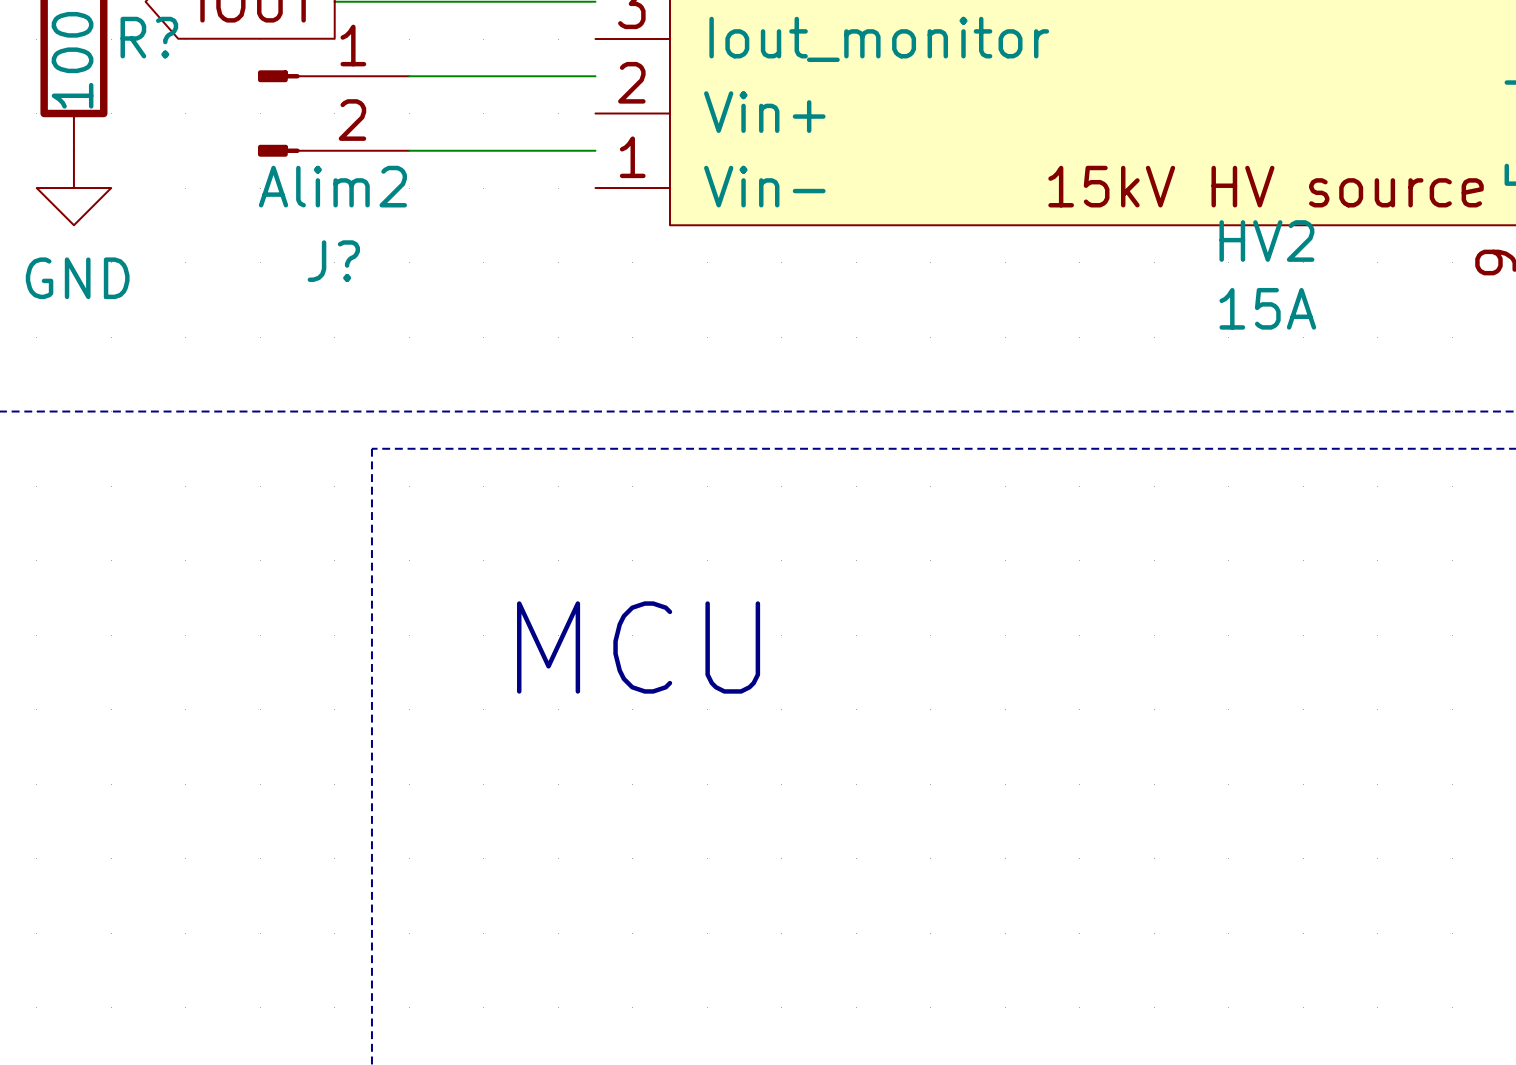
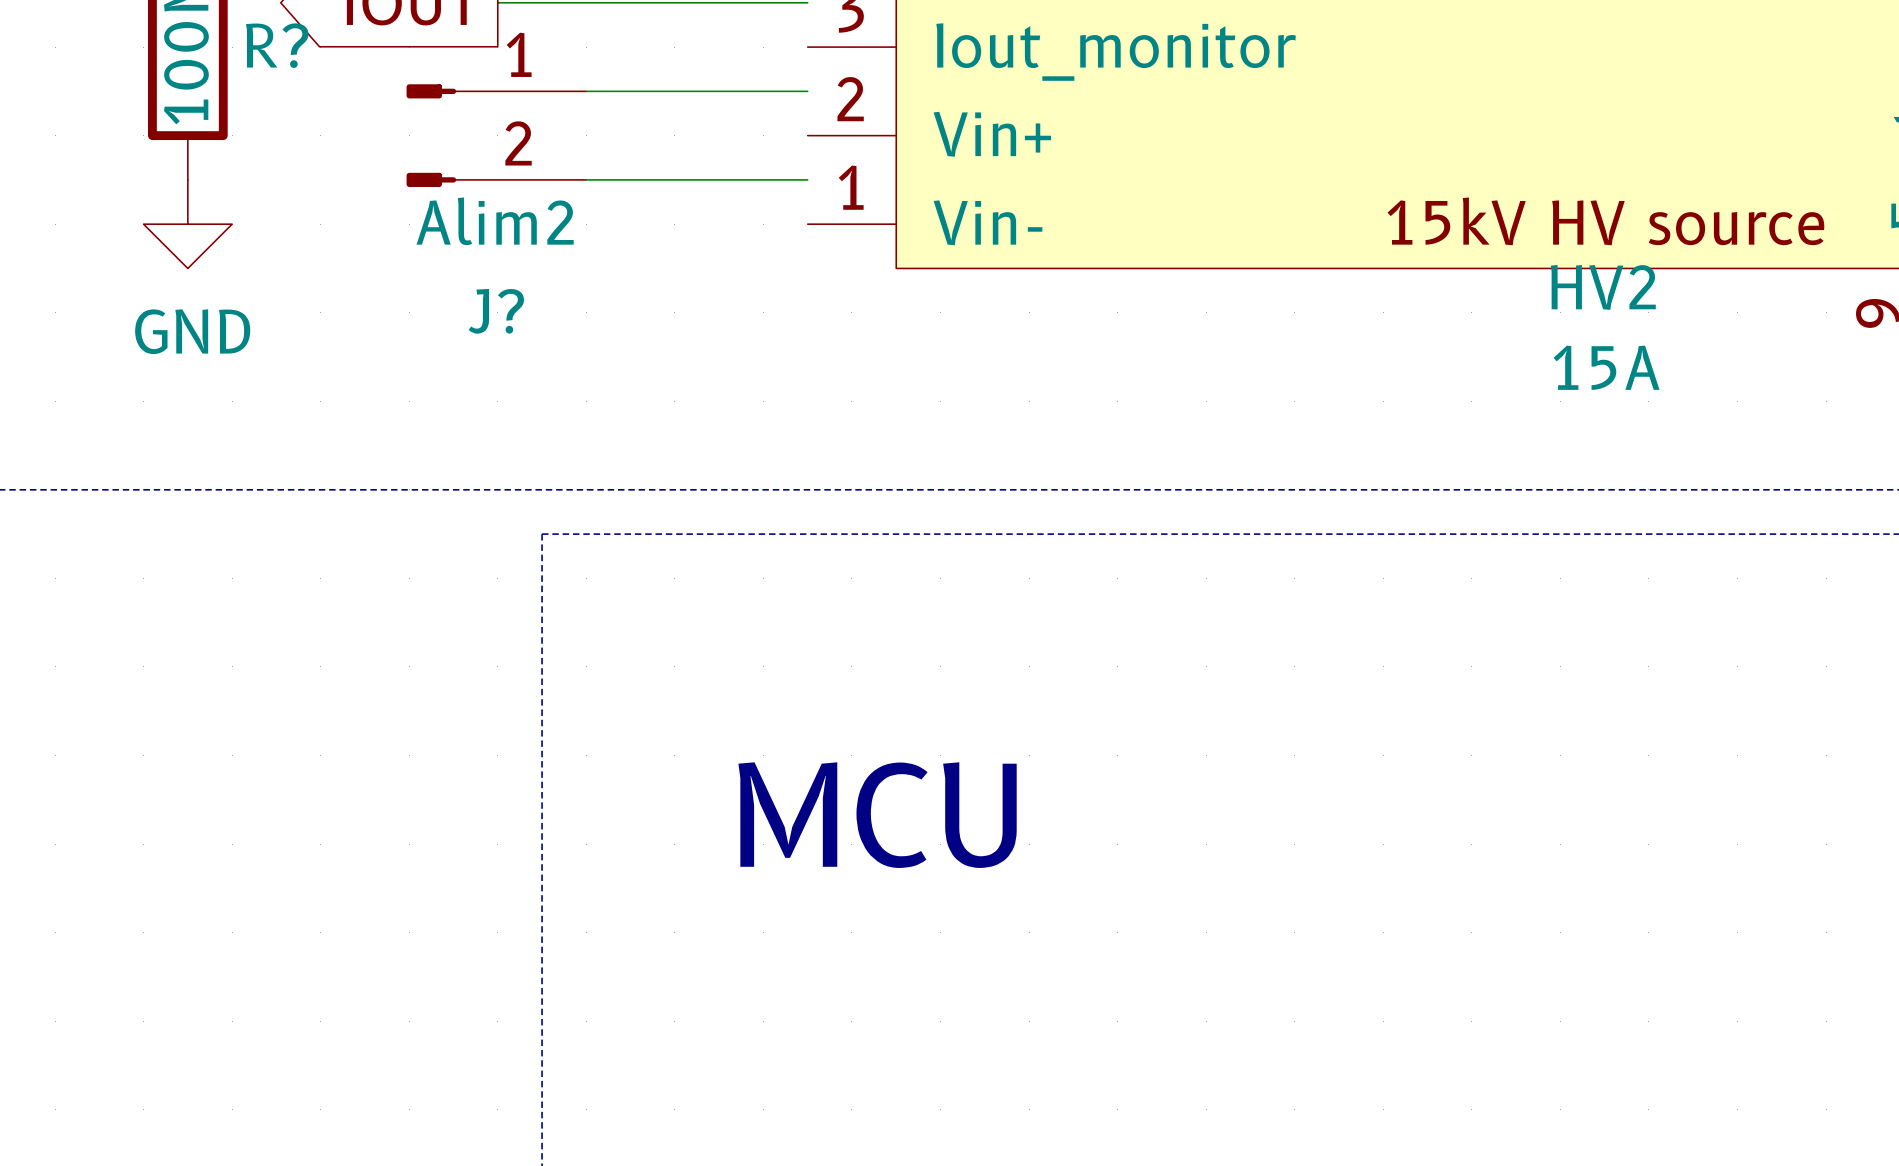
text position: MCU (638, 647) -> MCU (877, 815)

